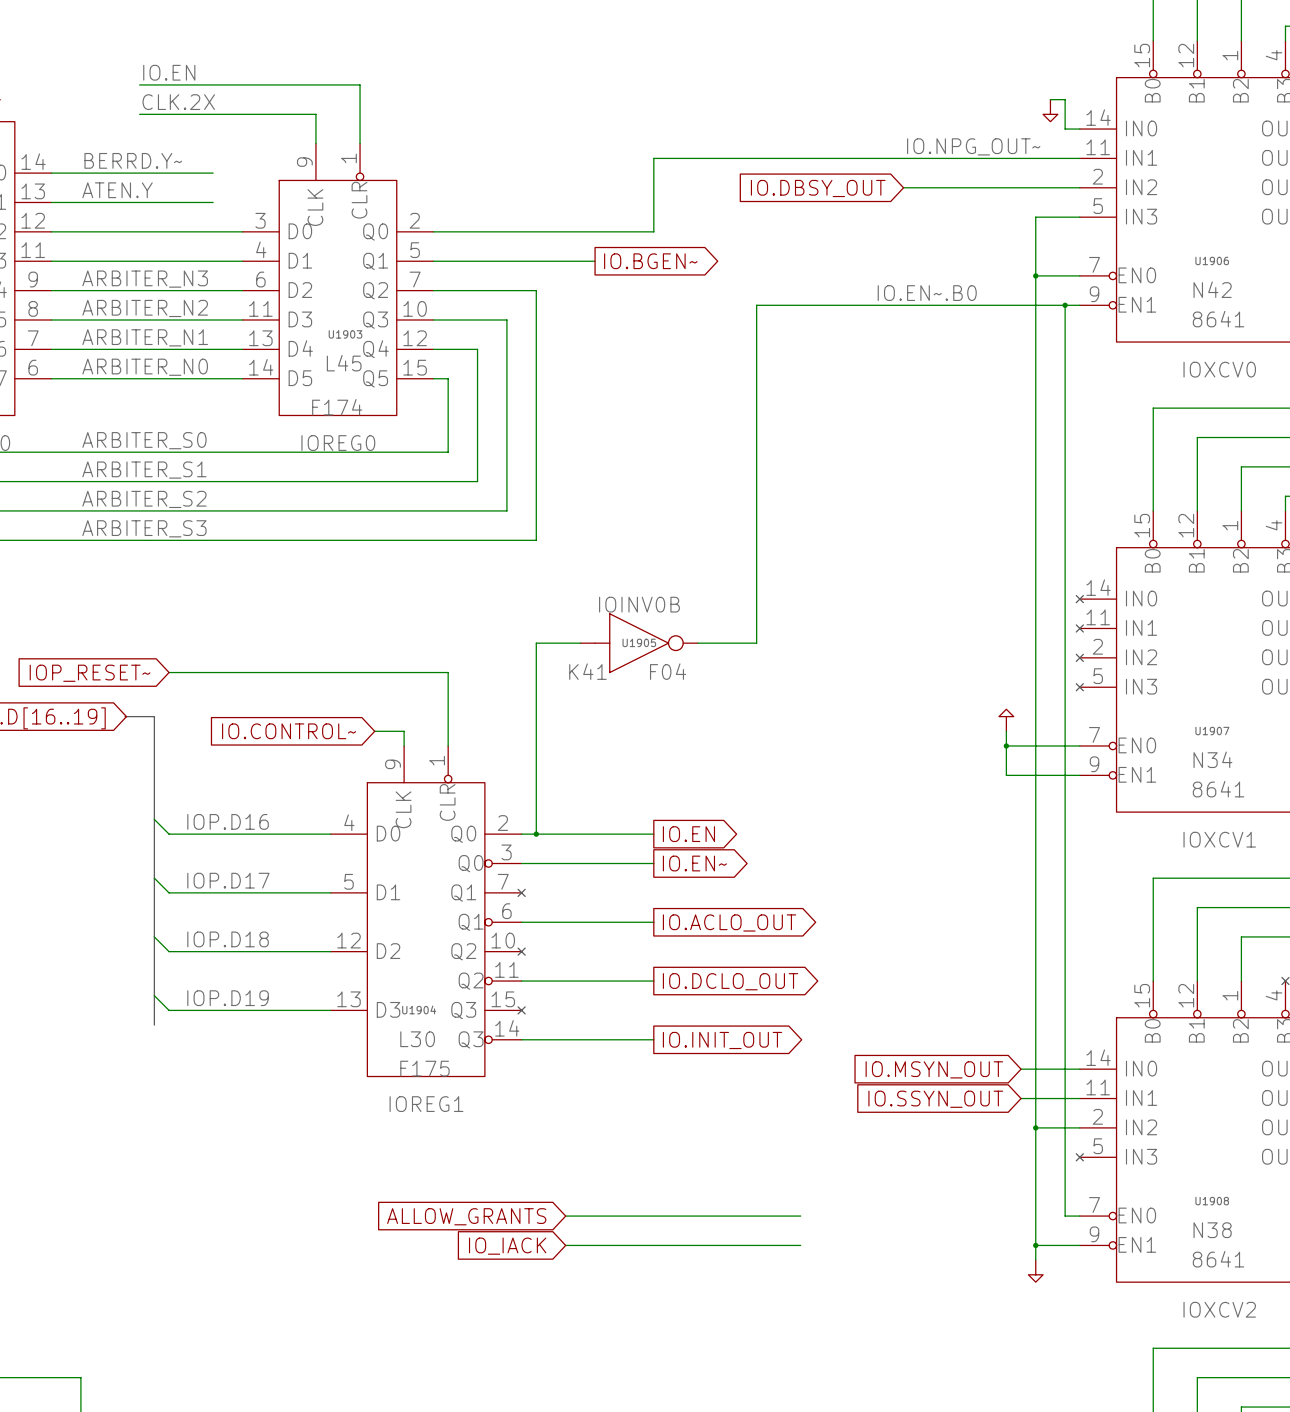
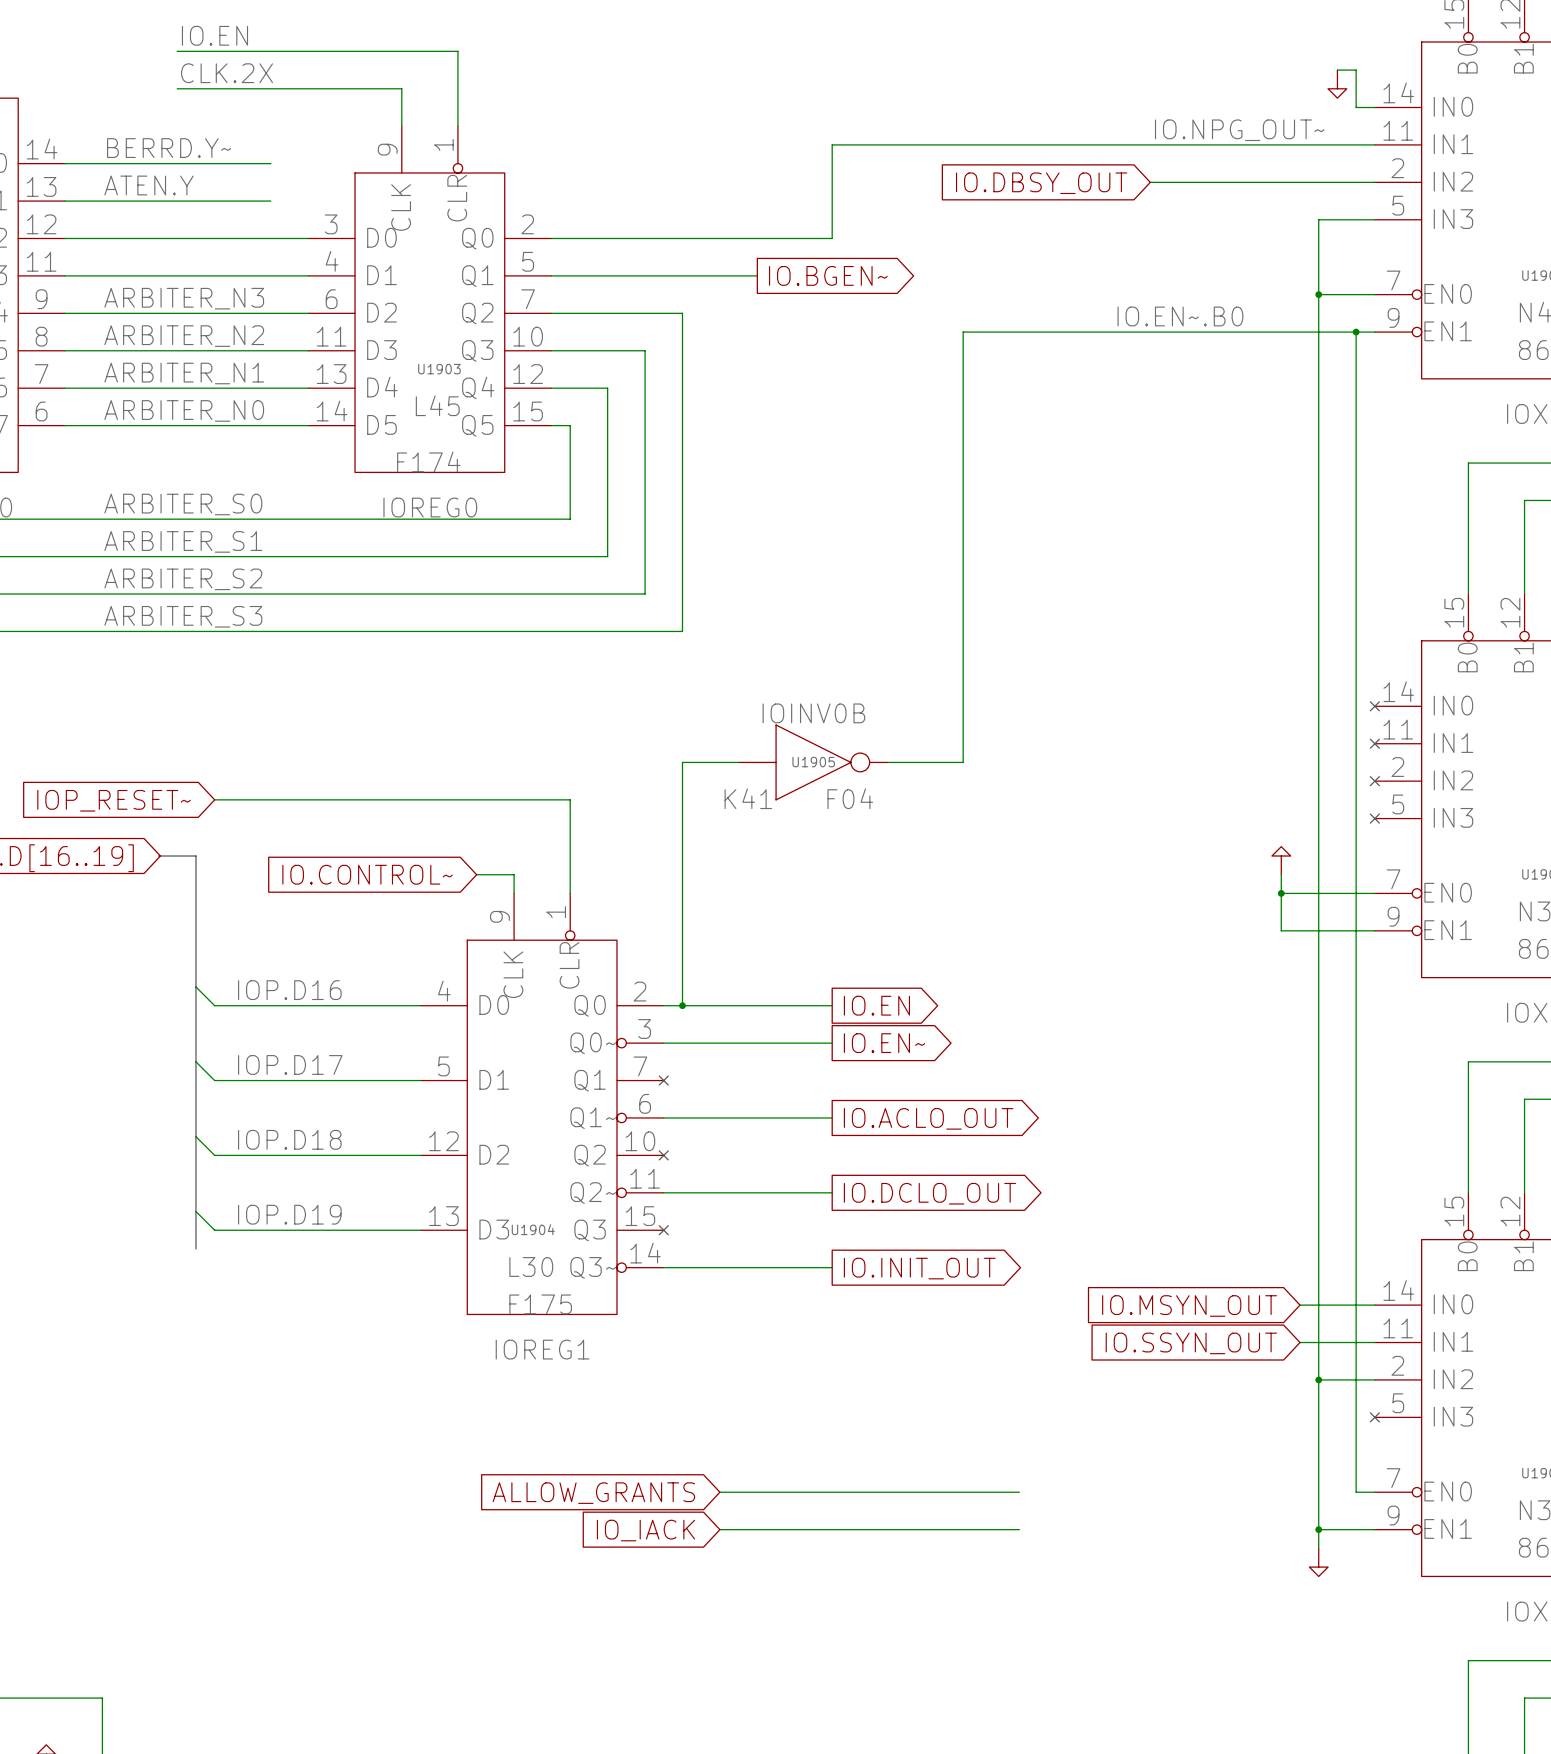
U1904 pin name: Q0 (471, 863) -> Q0~ (593, 1043)
U1904 pin name: Q1 (471, 922) -> Q1~ (593, 1118)
U1904 pin name: Q2 (471, 981) -> Q2~ (593, 1193)
U1904 pin name: Q3 (471, 1039) -> Q3~ (593, 1267)

